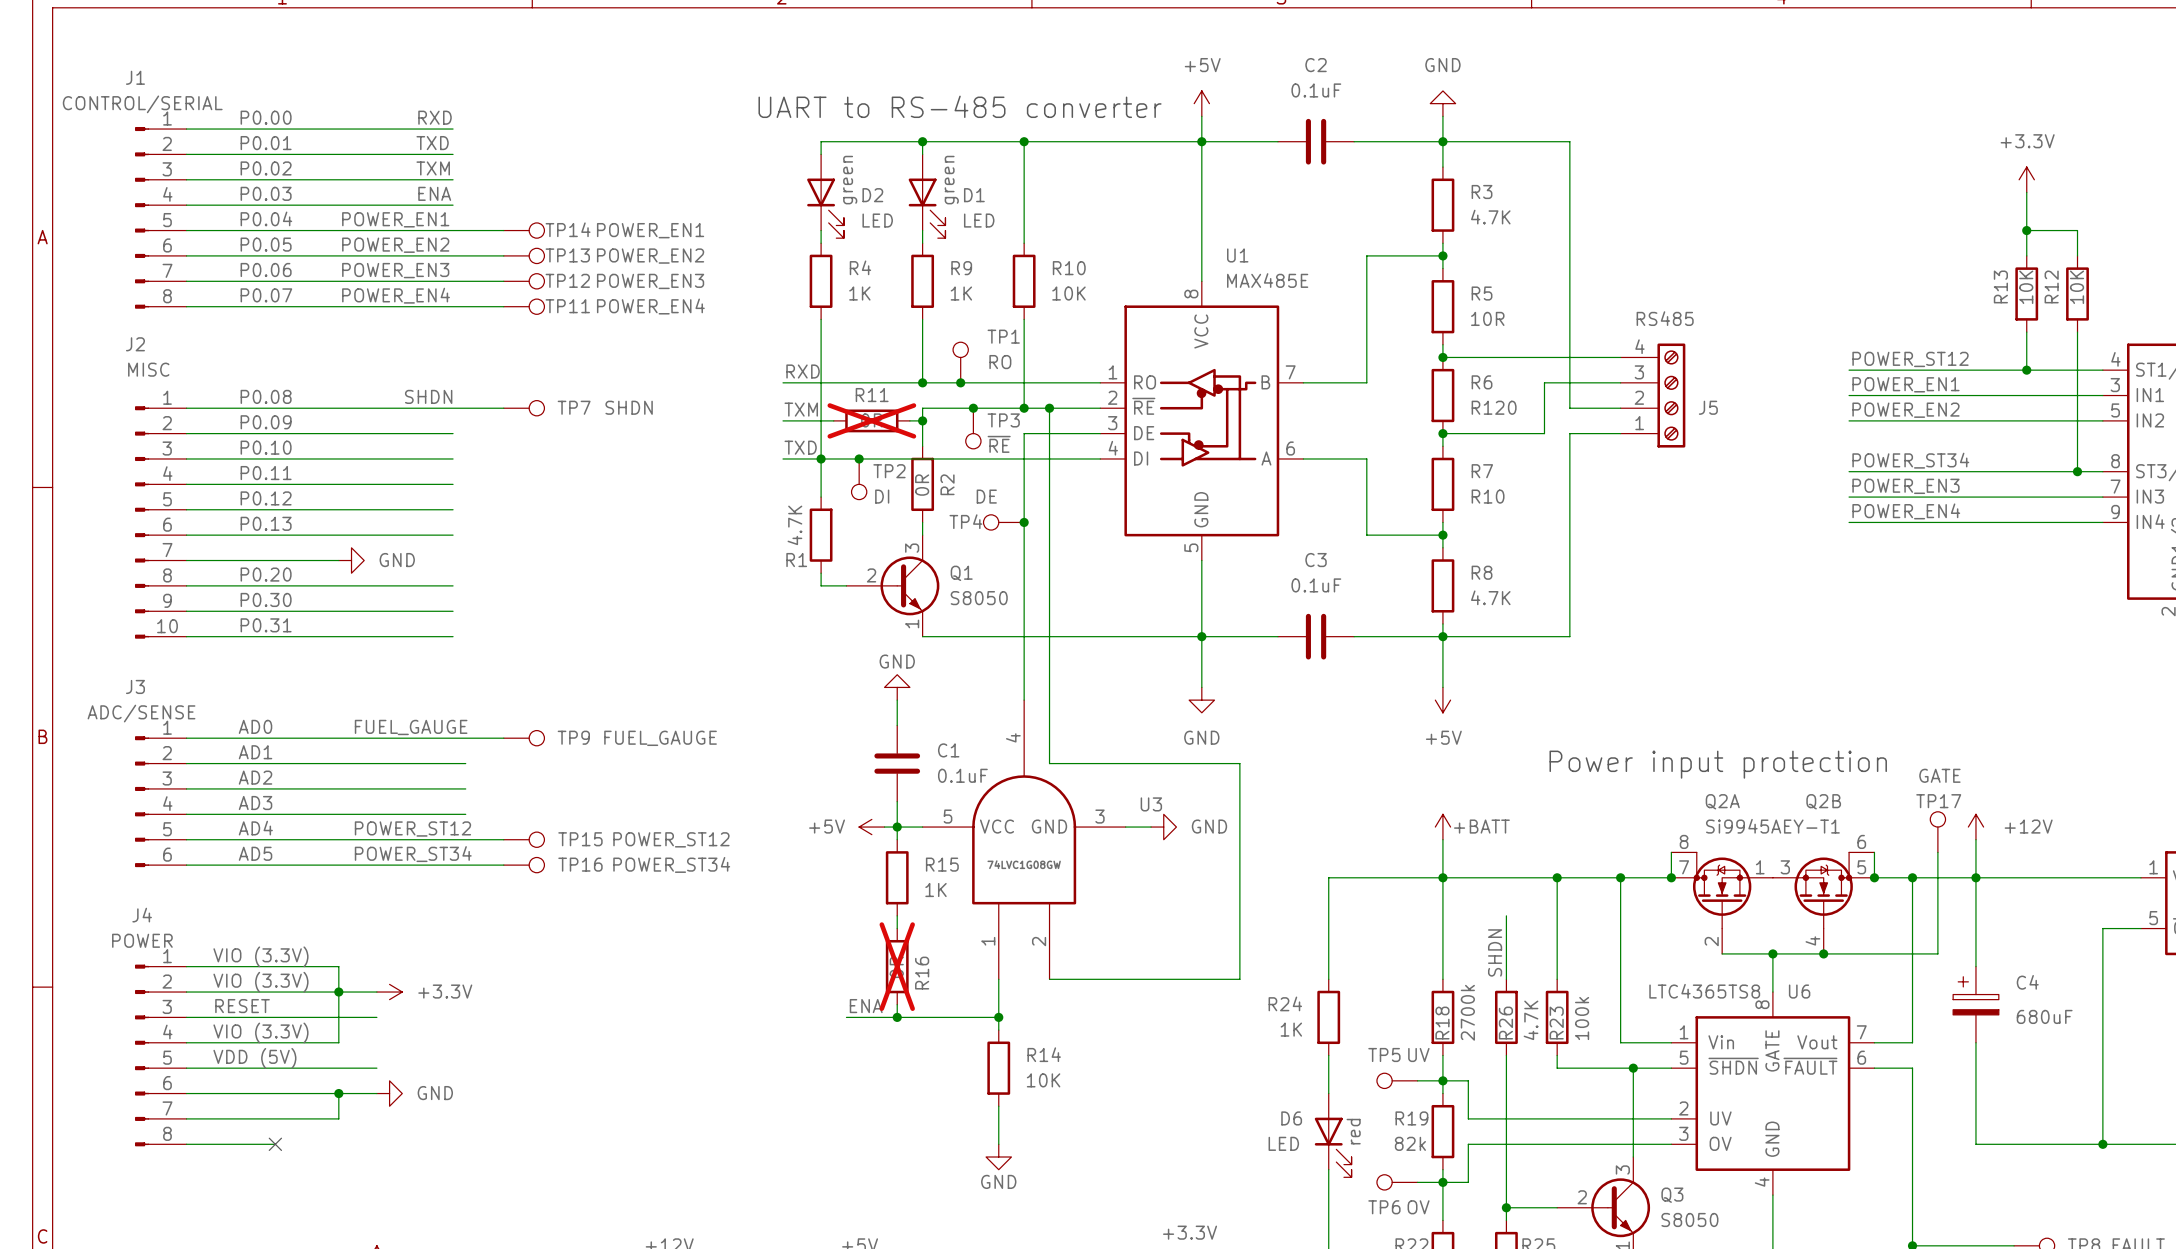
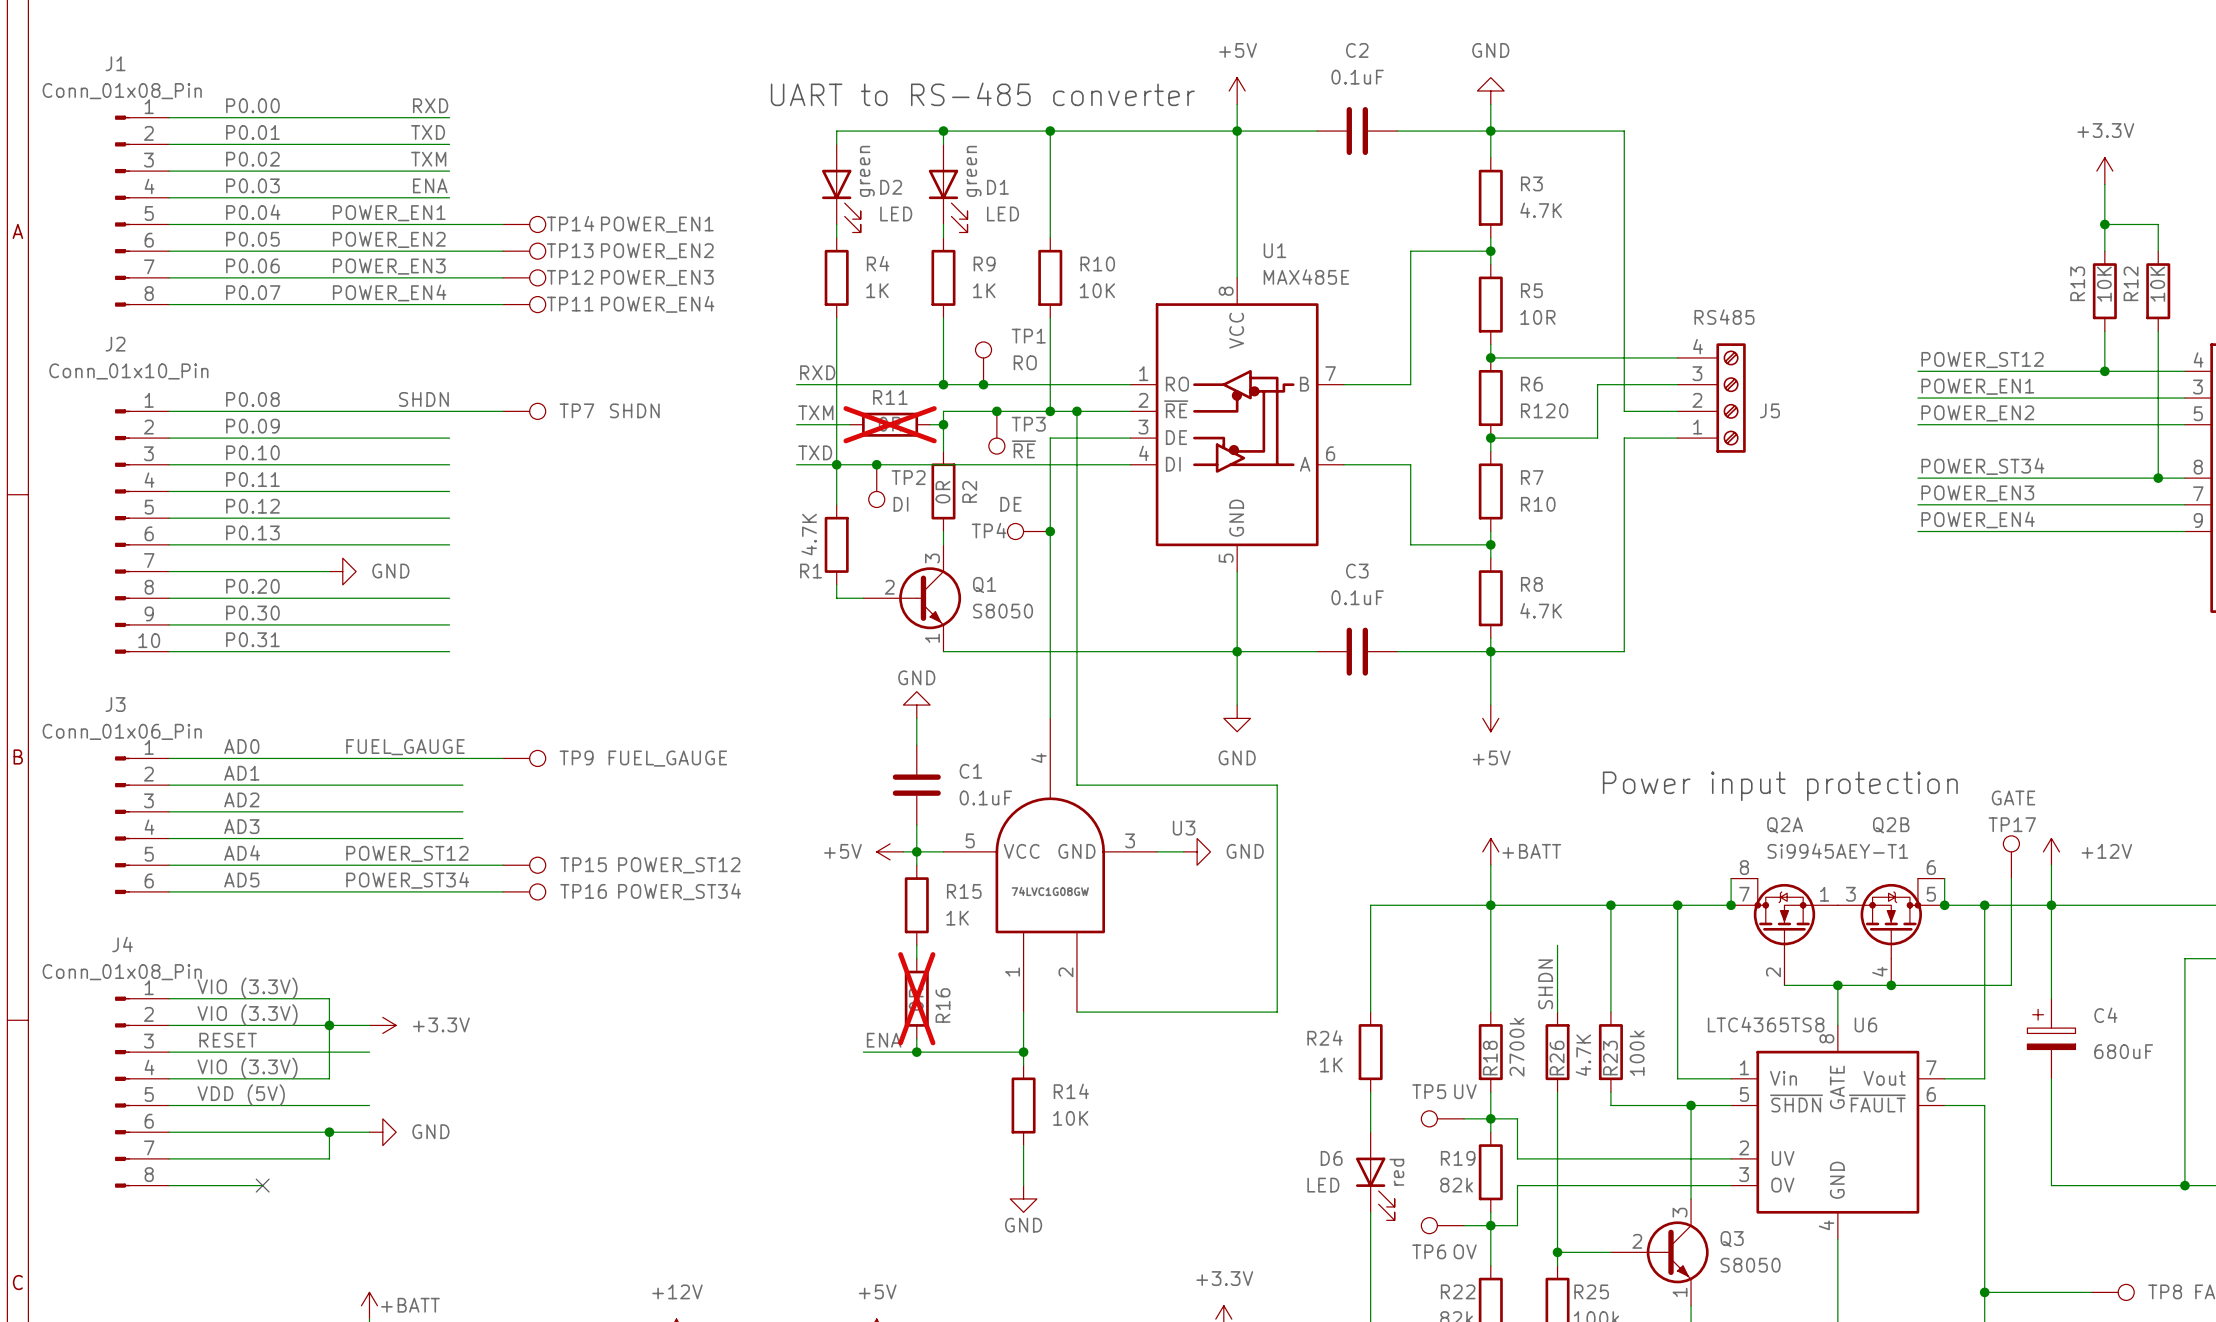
J1 value: CONTROL/SERIAL (142, 104) -> Conn_01x08_Pin (122, 91)
J2 value: MISC (148, 369) -> Conn_01x10_Pin (128, 371)
J3 value: ADC/SENSE (141, 713) -> Conn_01x06_Pin (122, 731)
J4 value: POWER (142, 940) -> Conn_01x08_Pin (122, 972)

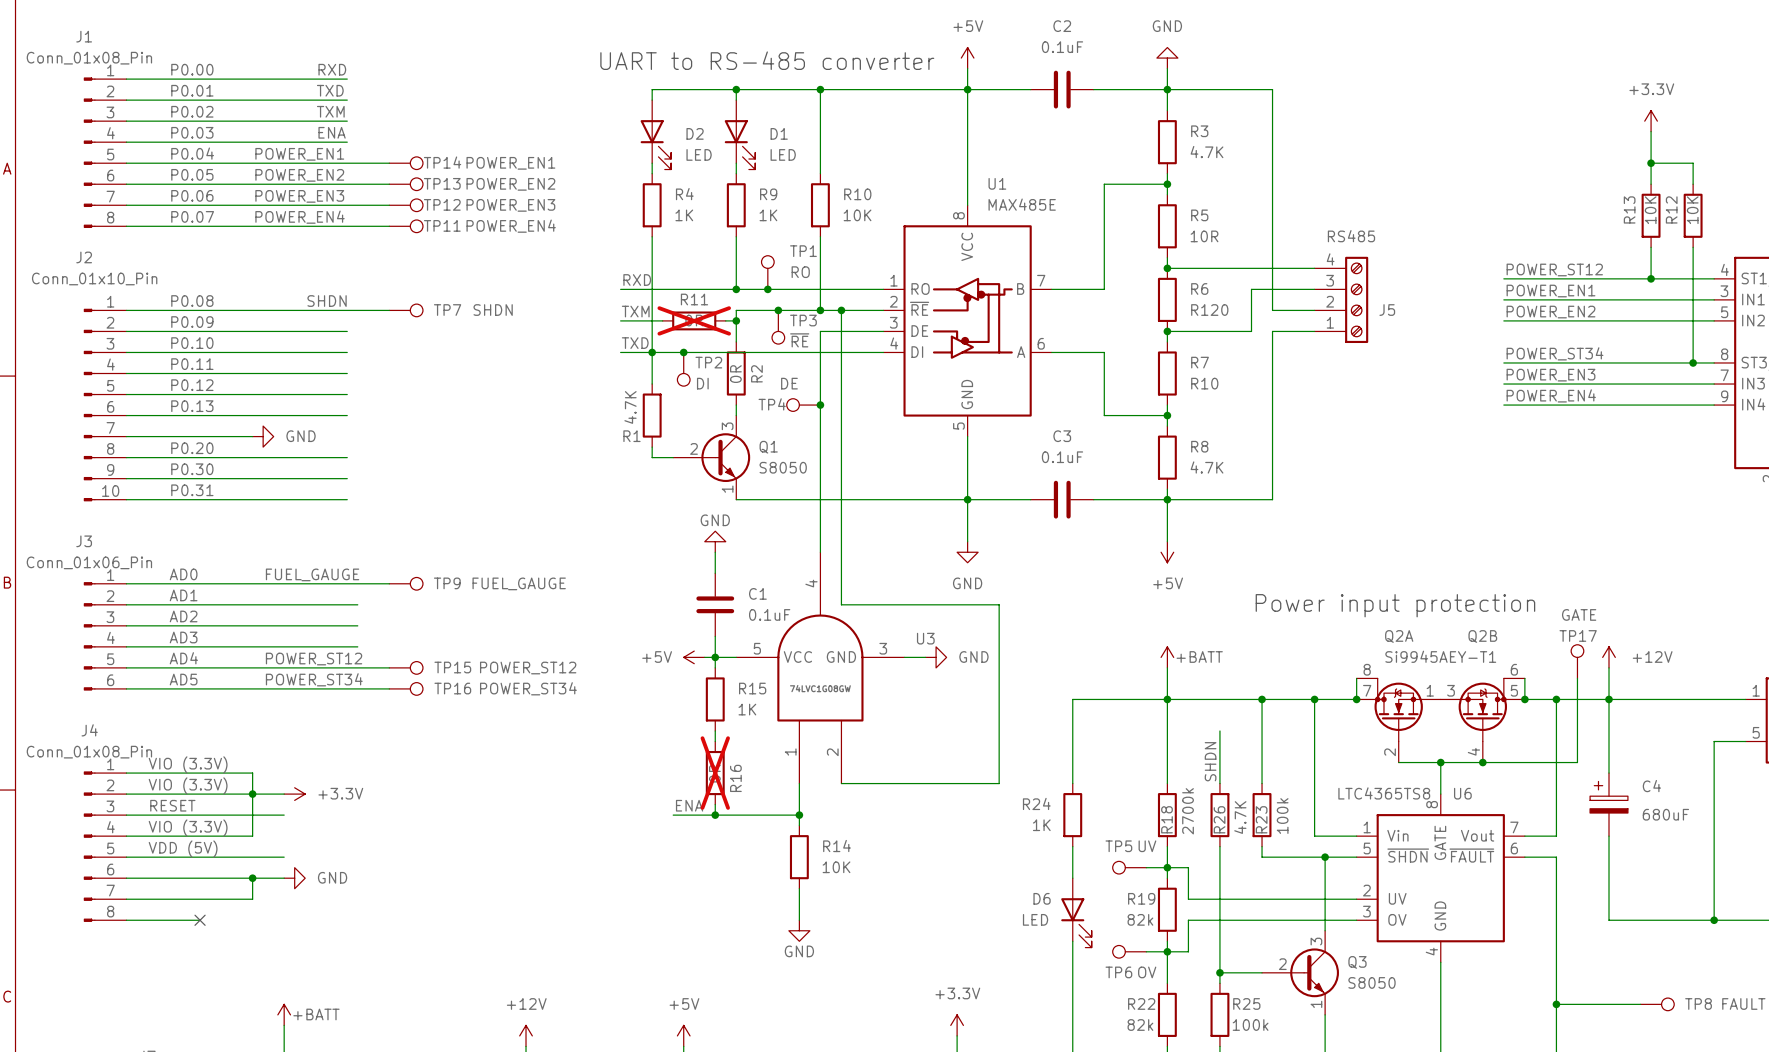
D2 text: green (867, 171) -> none
D1 text: green (974, 171) -> none
D6 text: red (1396, 1172) -> none

